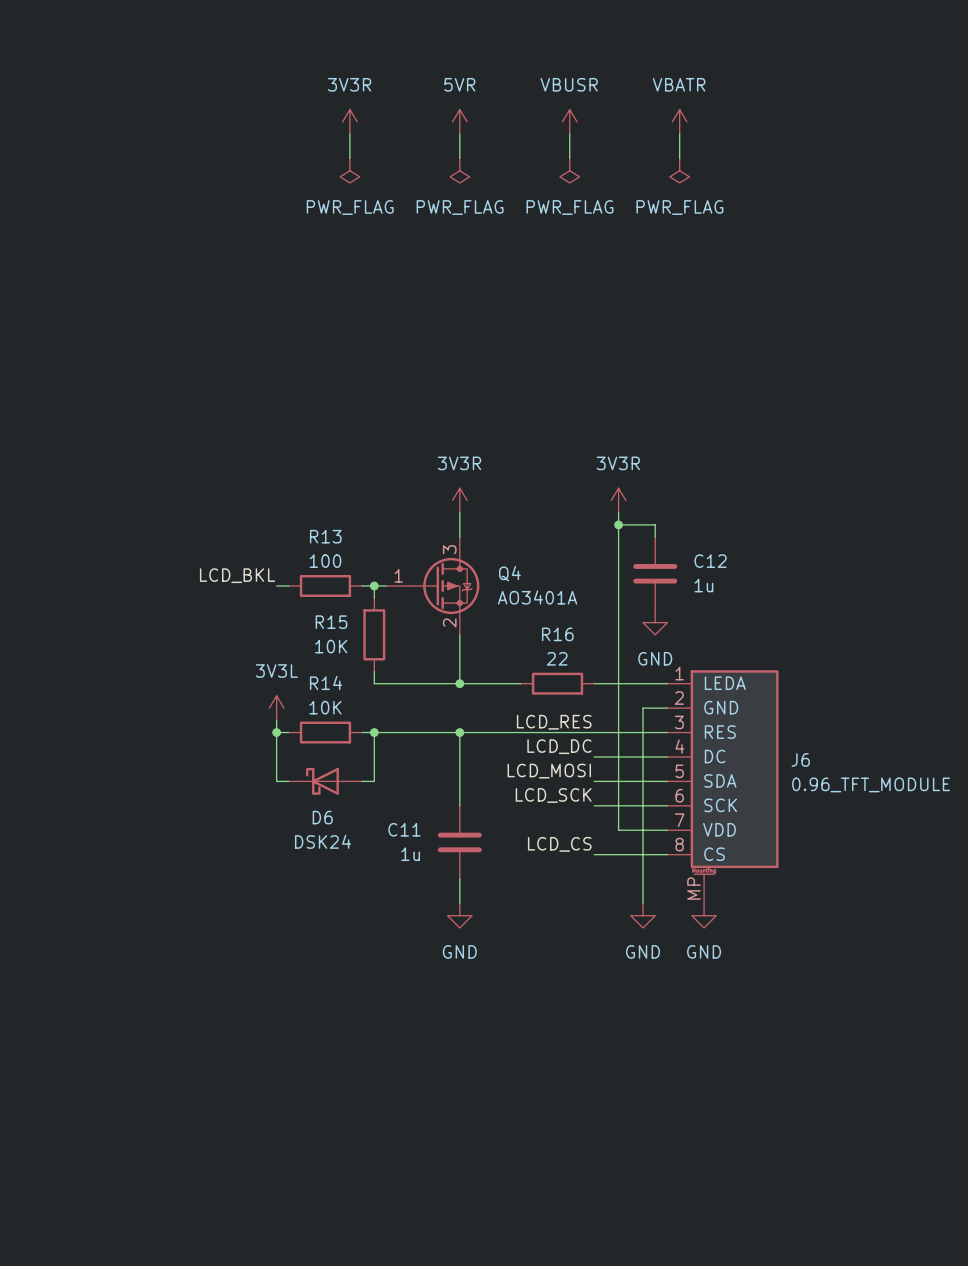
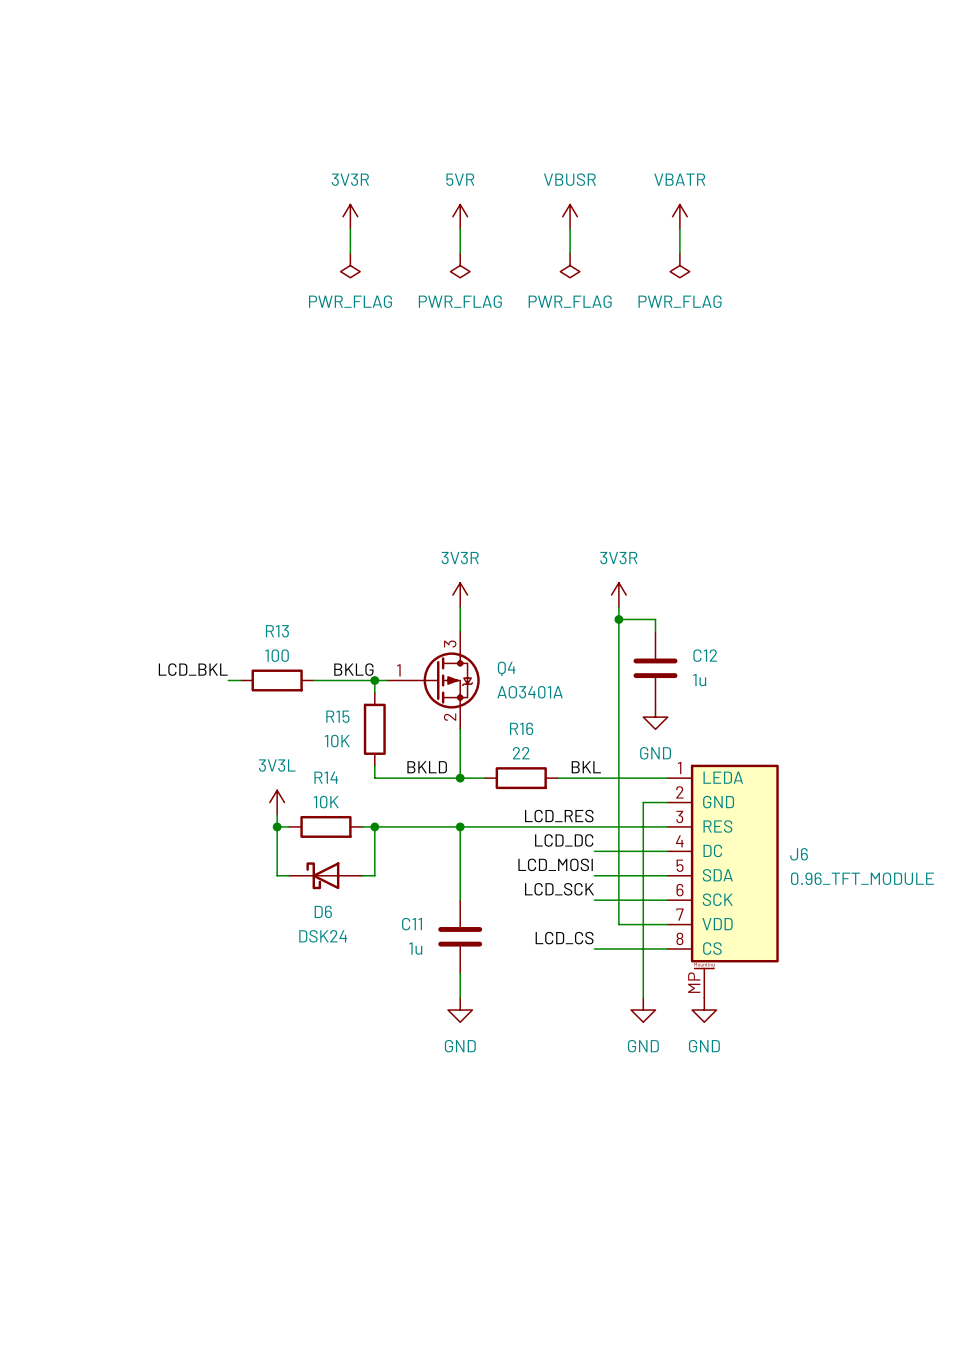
label position: LCD_BKL (237, 575) -> LCD_BKL (193, 669)
label: none -> BKLG (353, 669)
wire: (276, 585) (288, 585) -> (228, 680) (240, 680)
wire: none -> (313, 680) (362, 680)
R13 position: (325, 585) -> (277, 680)
label: none -> BKLD (427, 767)
label: none -> BKL (586, 767)
wire: (484, 683) (520, 683) -> (557, 778) (594, 778)
R16 position: (557, 683) -> (521, 778)

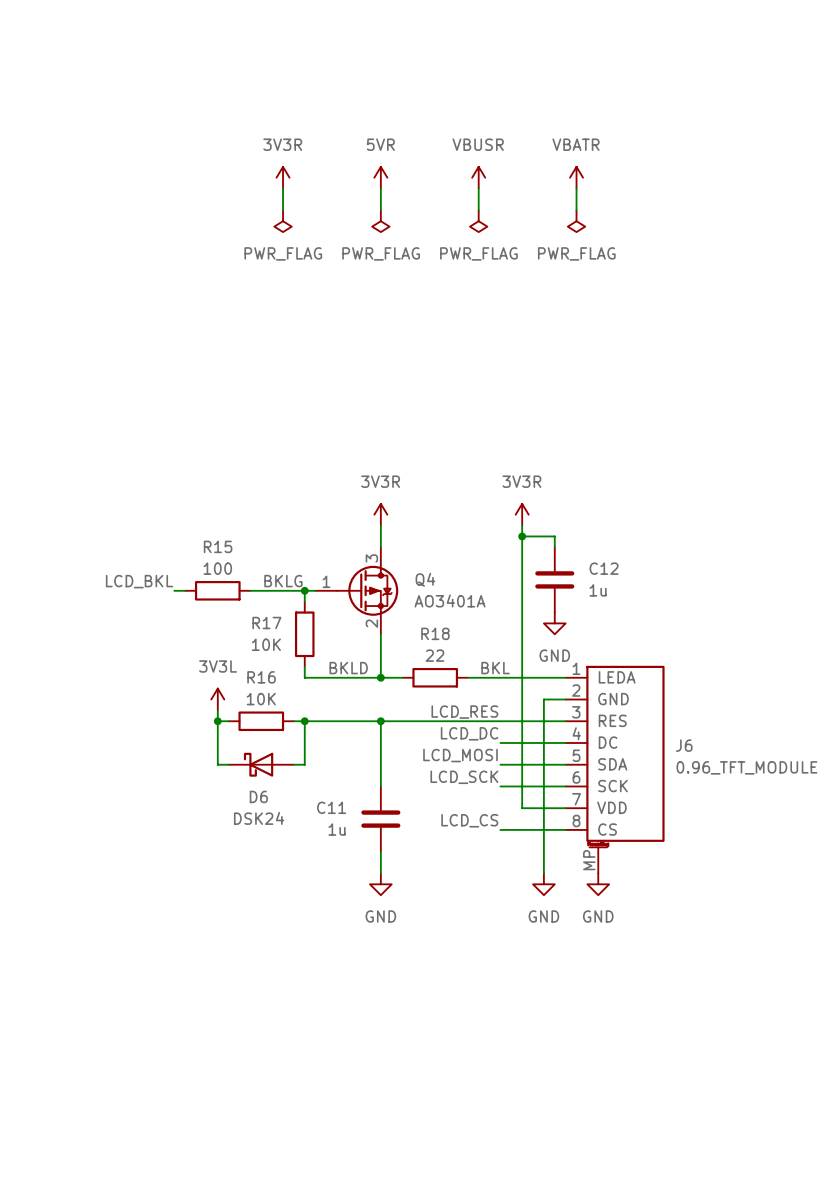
R13 name: R13 (277, 631) -> R15 (218, 546)
R15 name: R15 (337, 716) -> R17 (266, 623)
R16 name: R16 (521, 728) -> R18 (435, 633)
R14 name: R14 (326, 777) -> R16 (261, 677)

